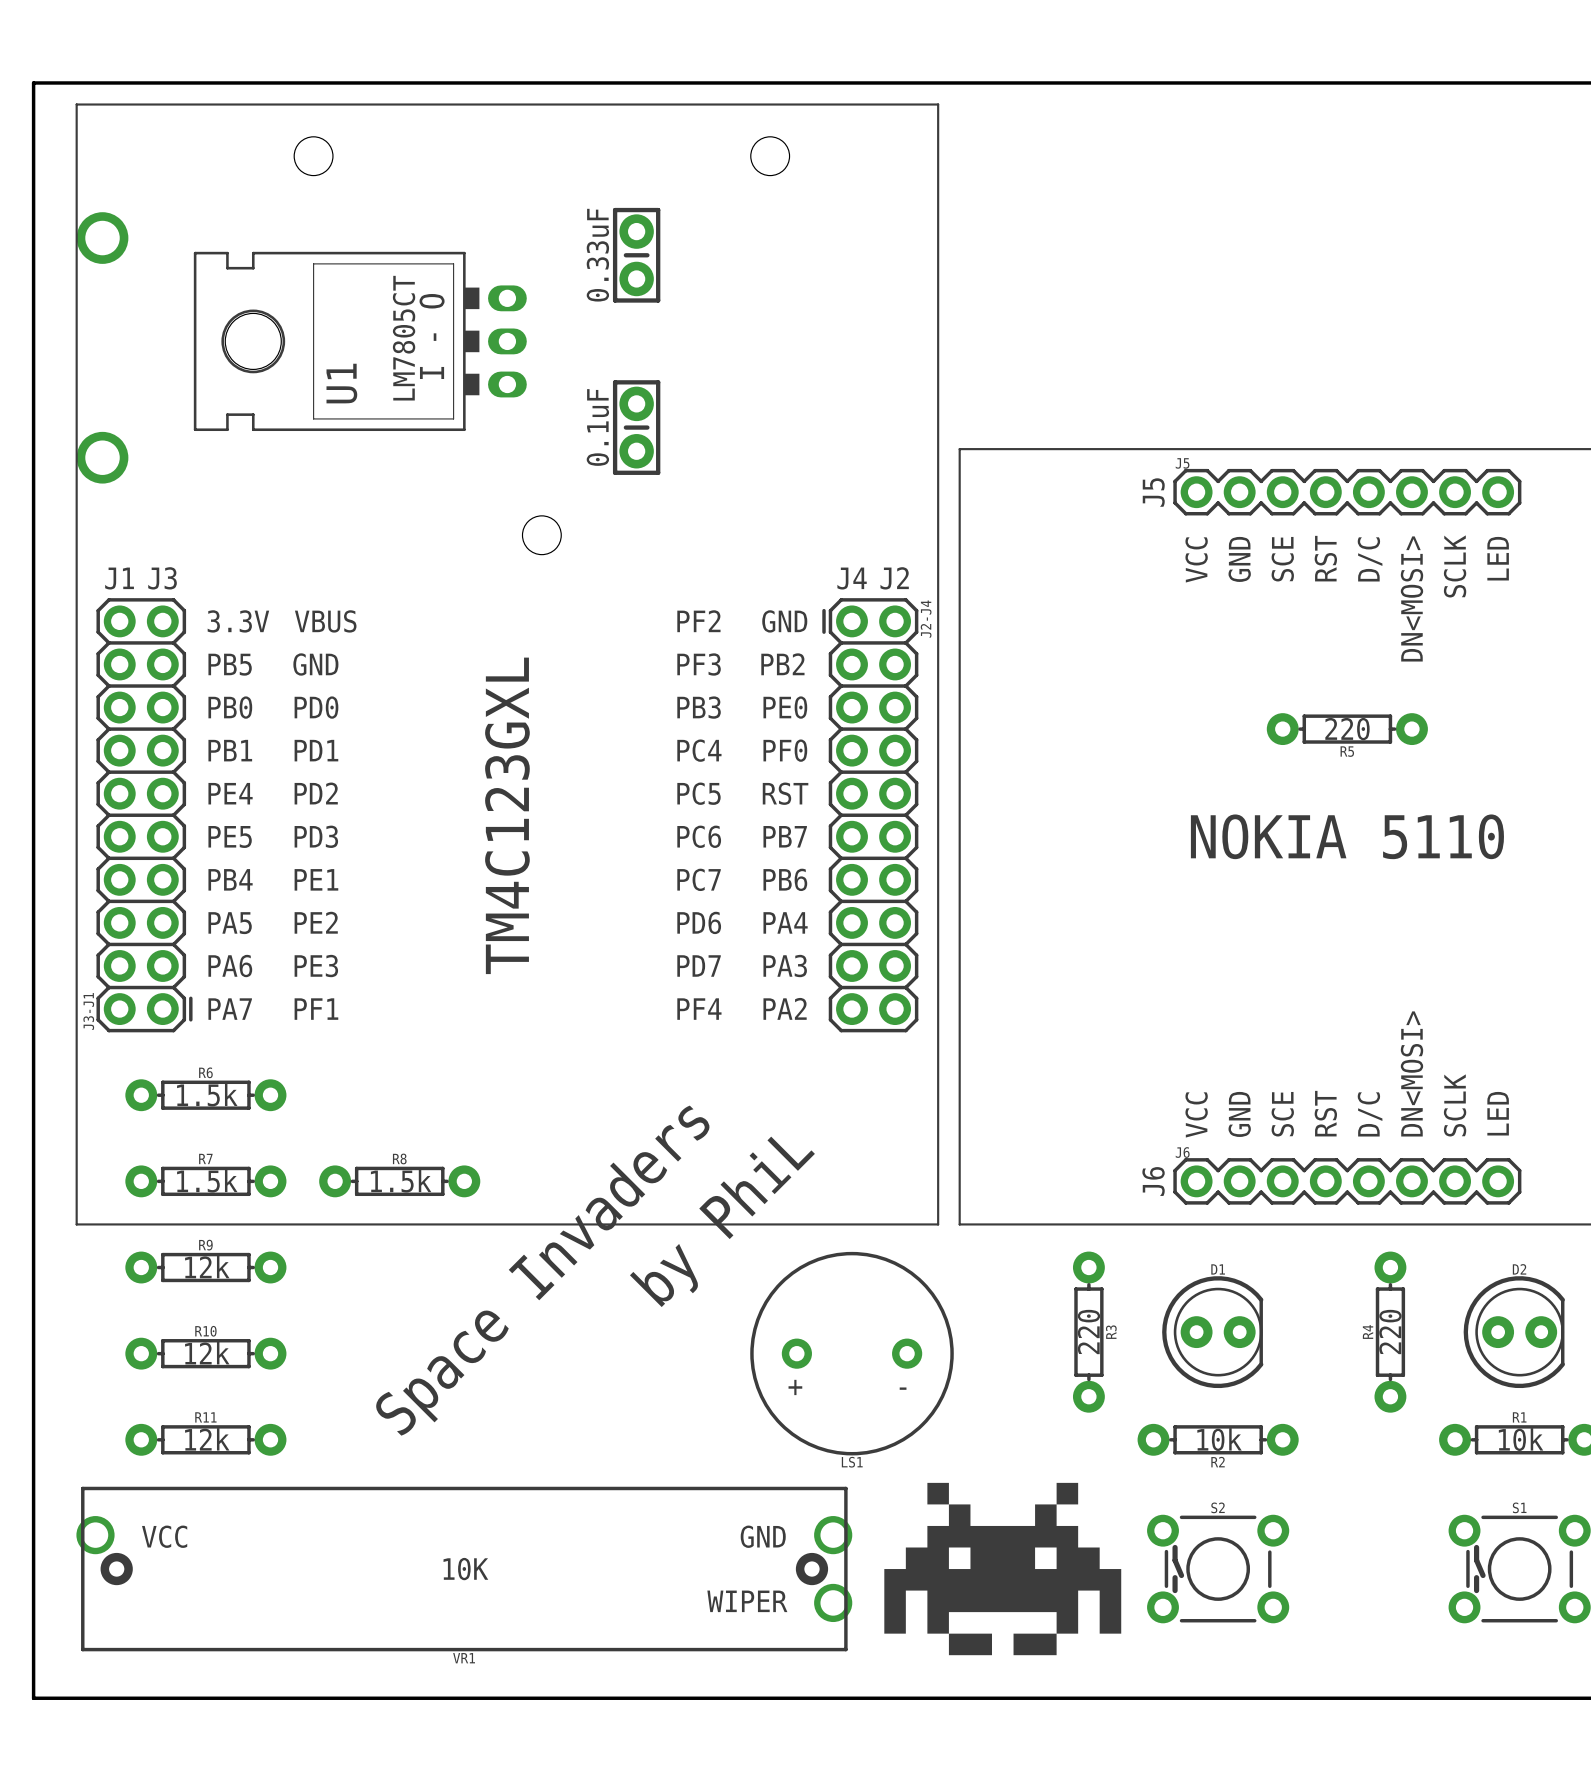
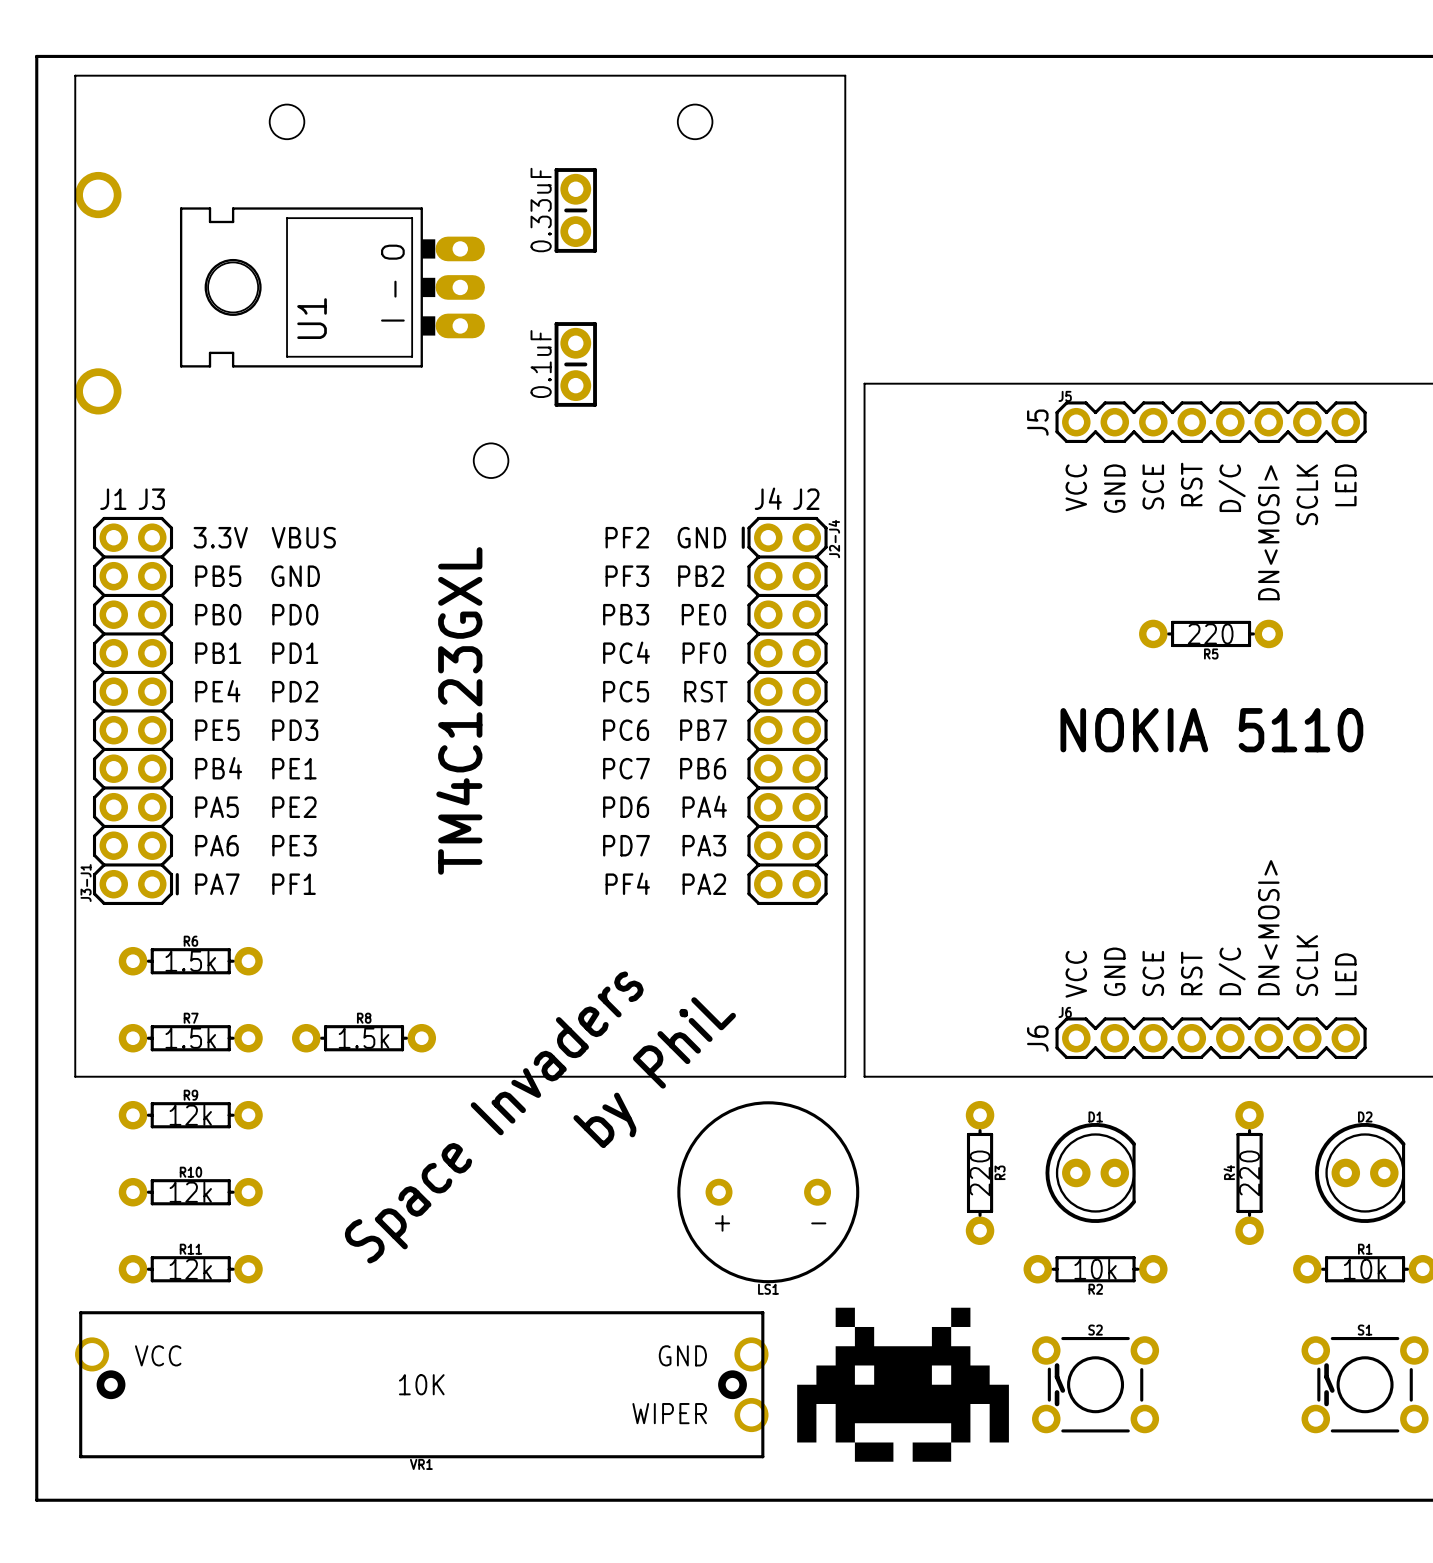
U1 footprint: [193, 251, 527, 432] -> [179, 207, 485, 368]
text: LM7805CT (404, 338) -> none

